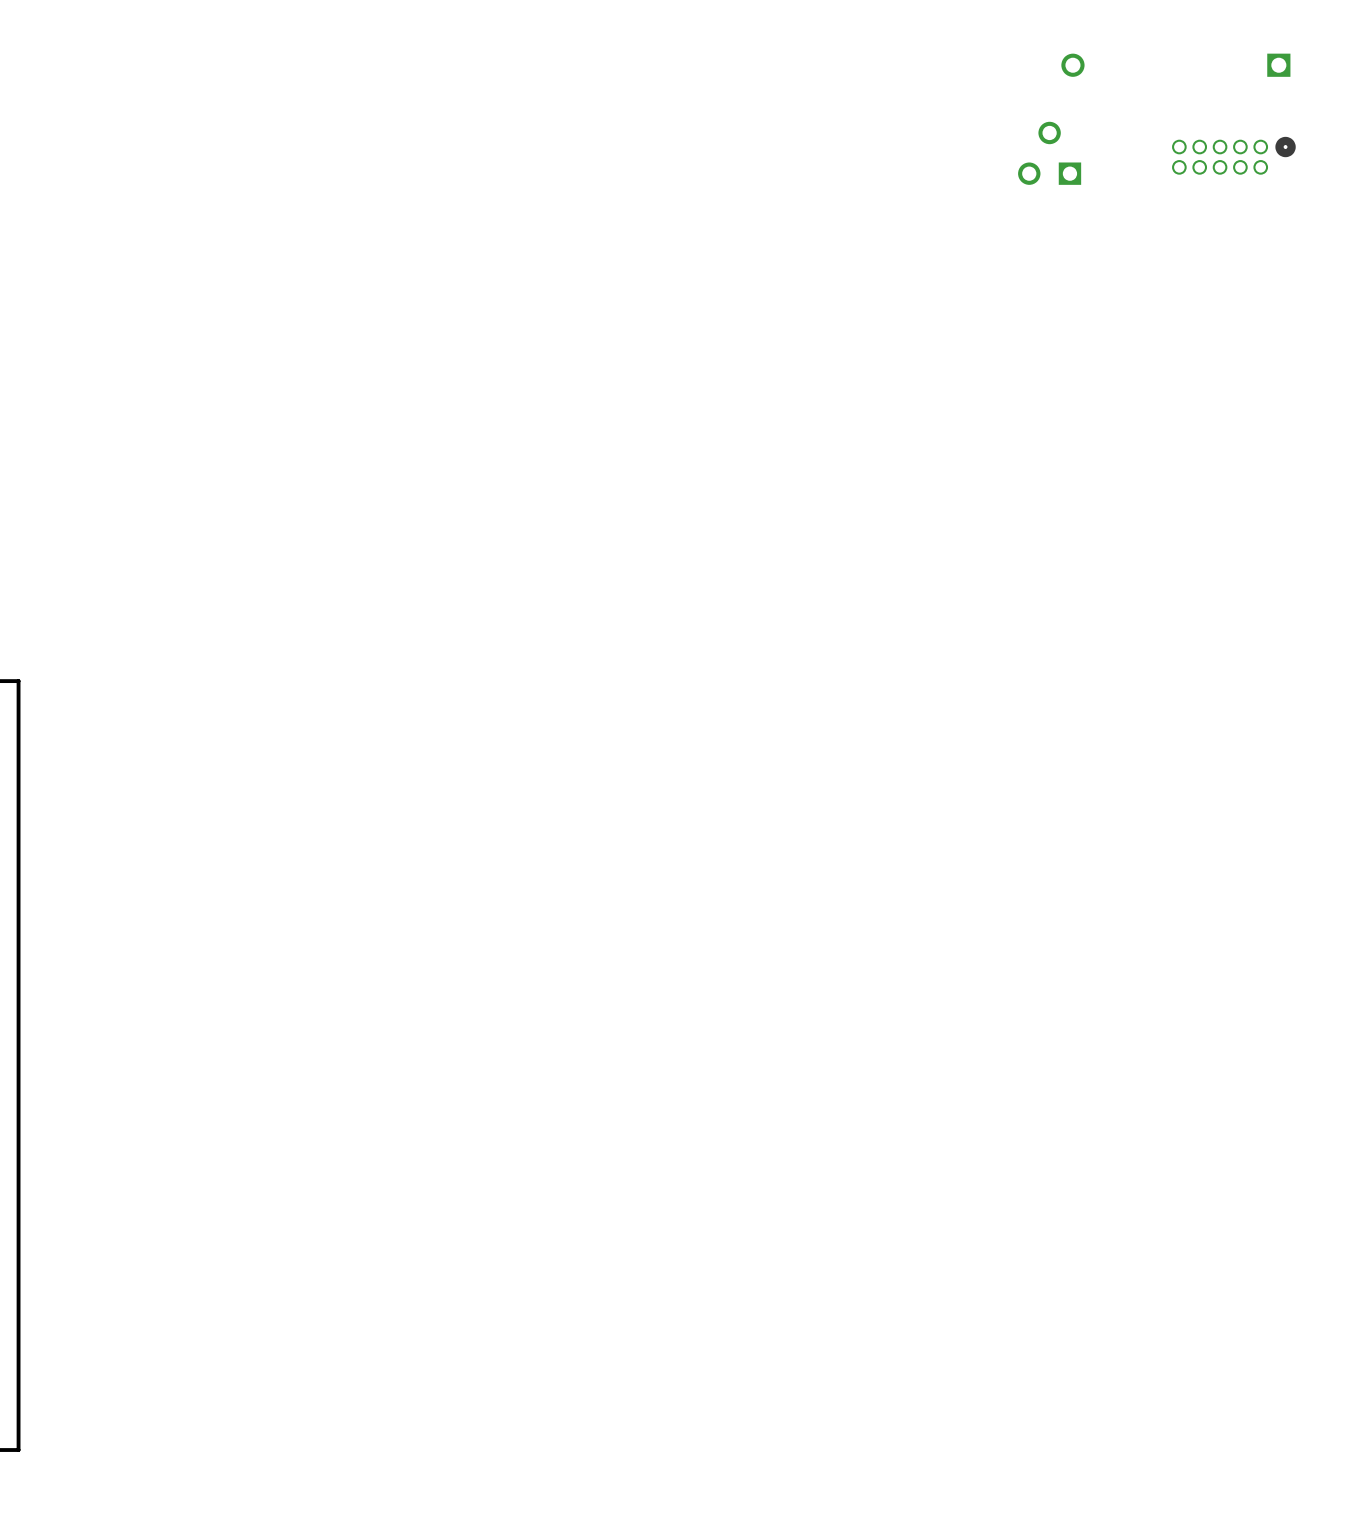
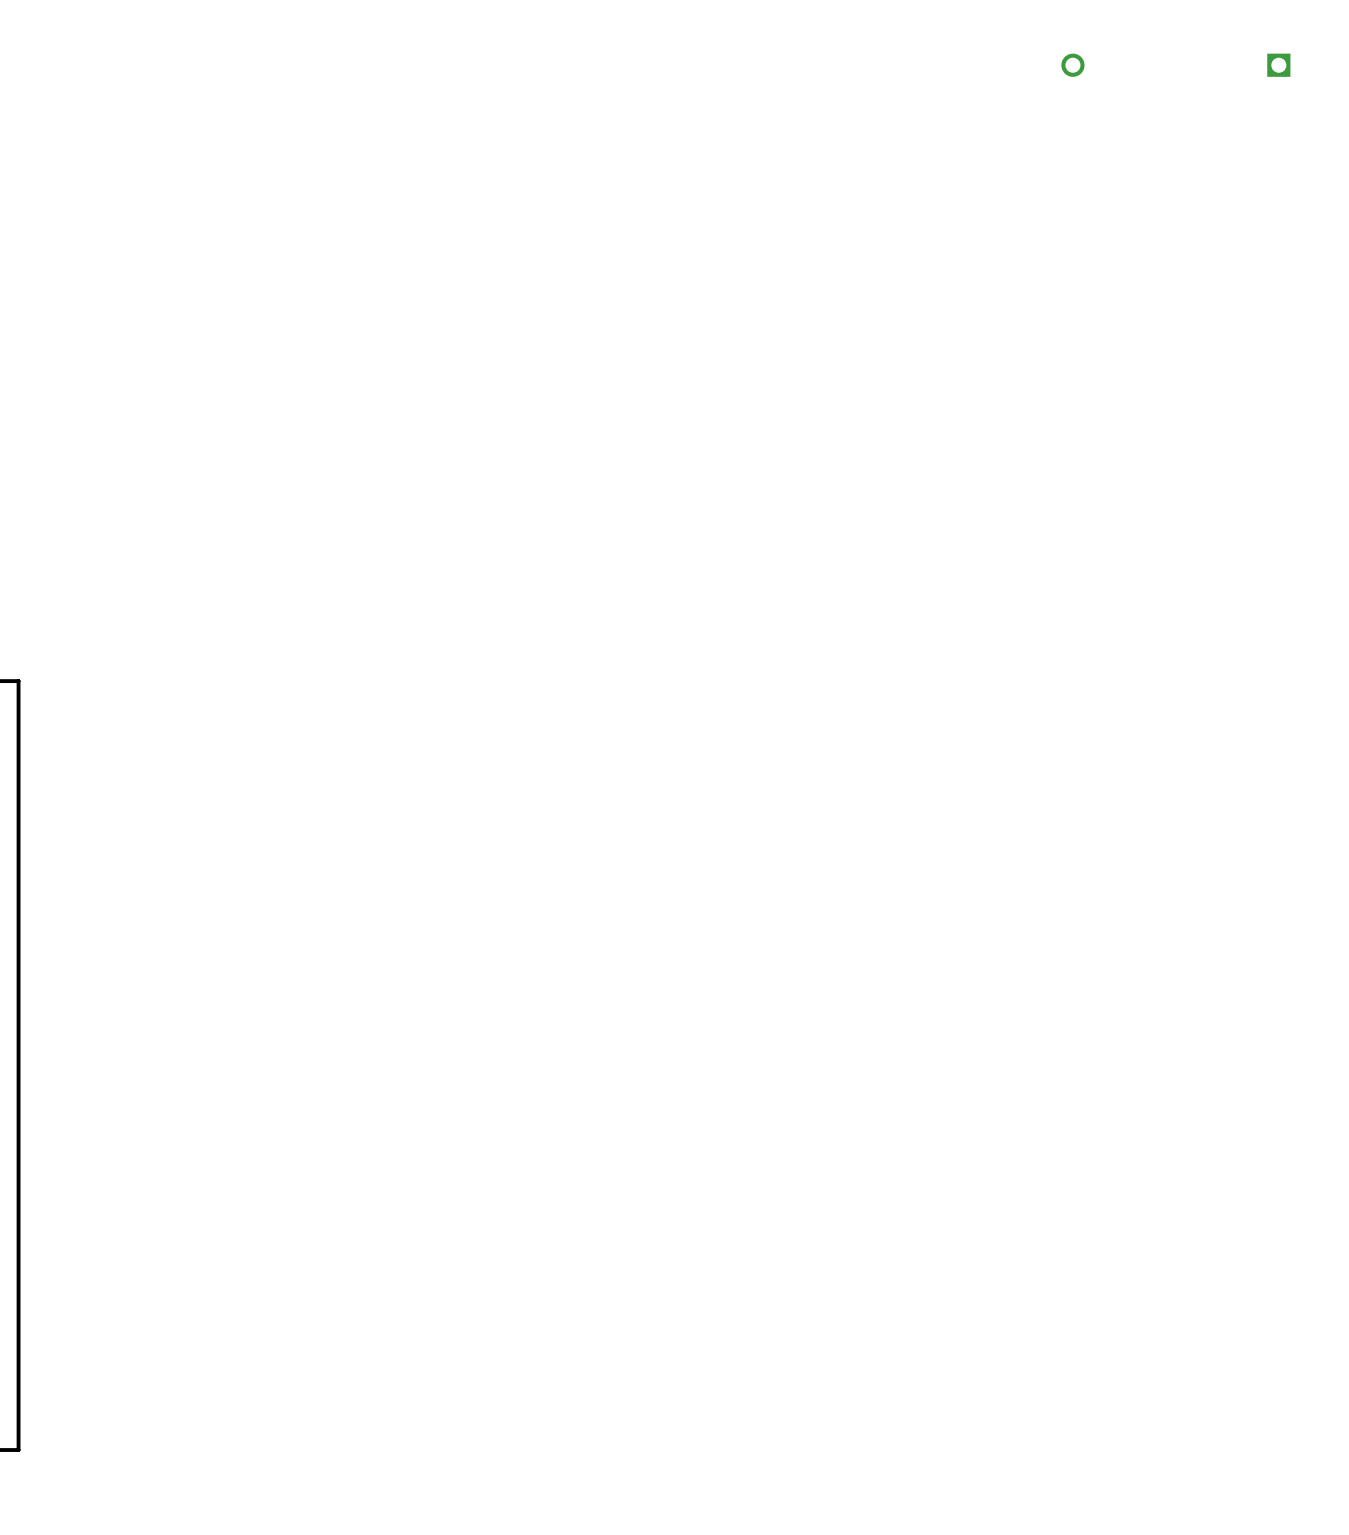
part: (1049, 153) -> none
part: (1233, 155) -> none

